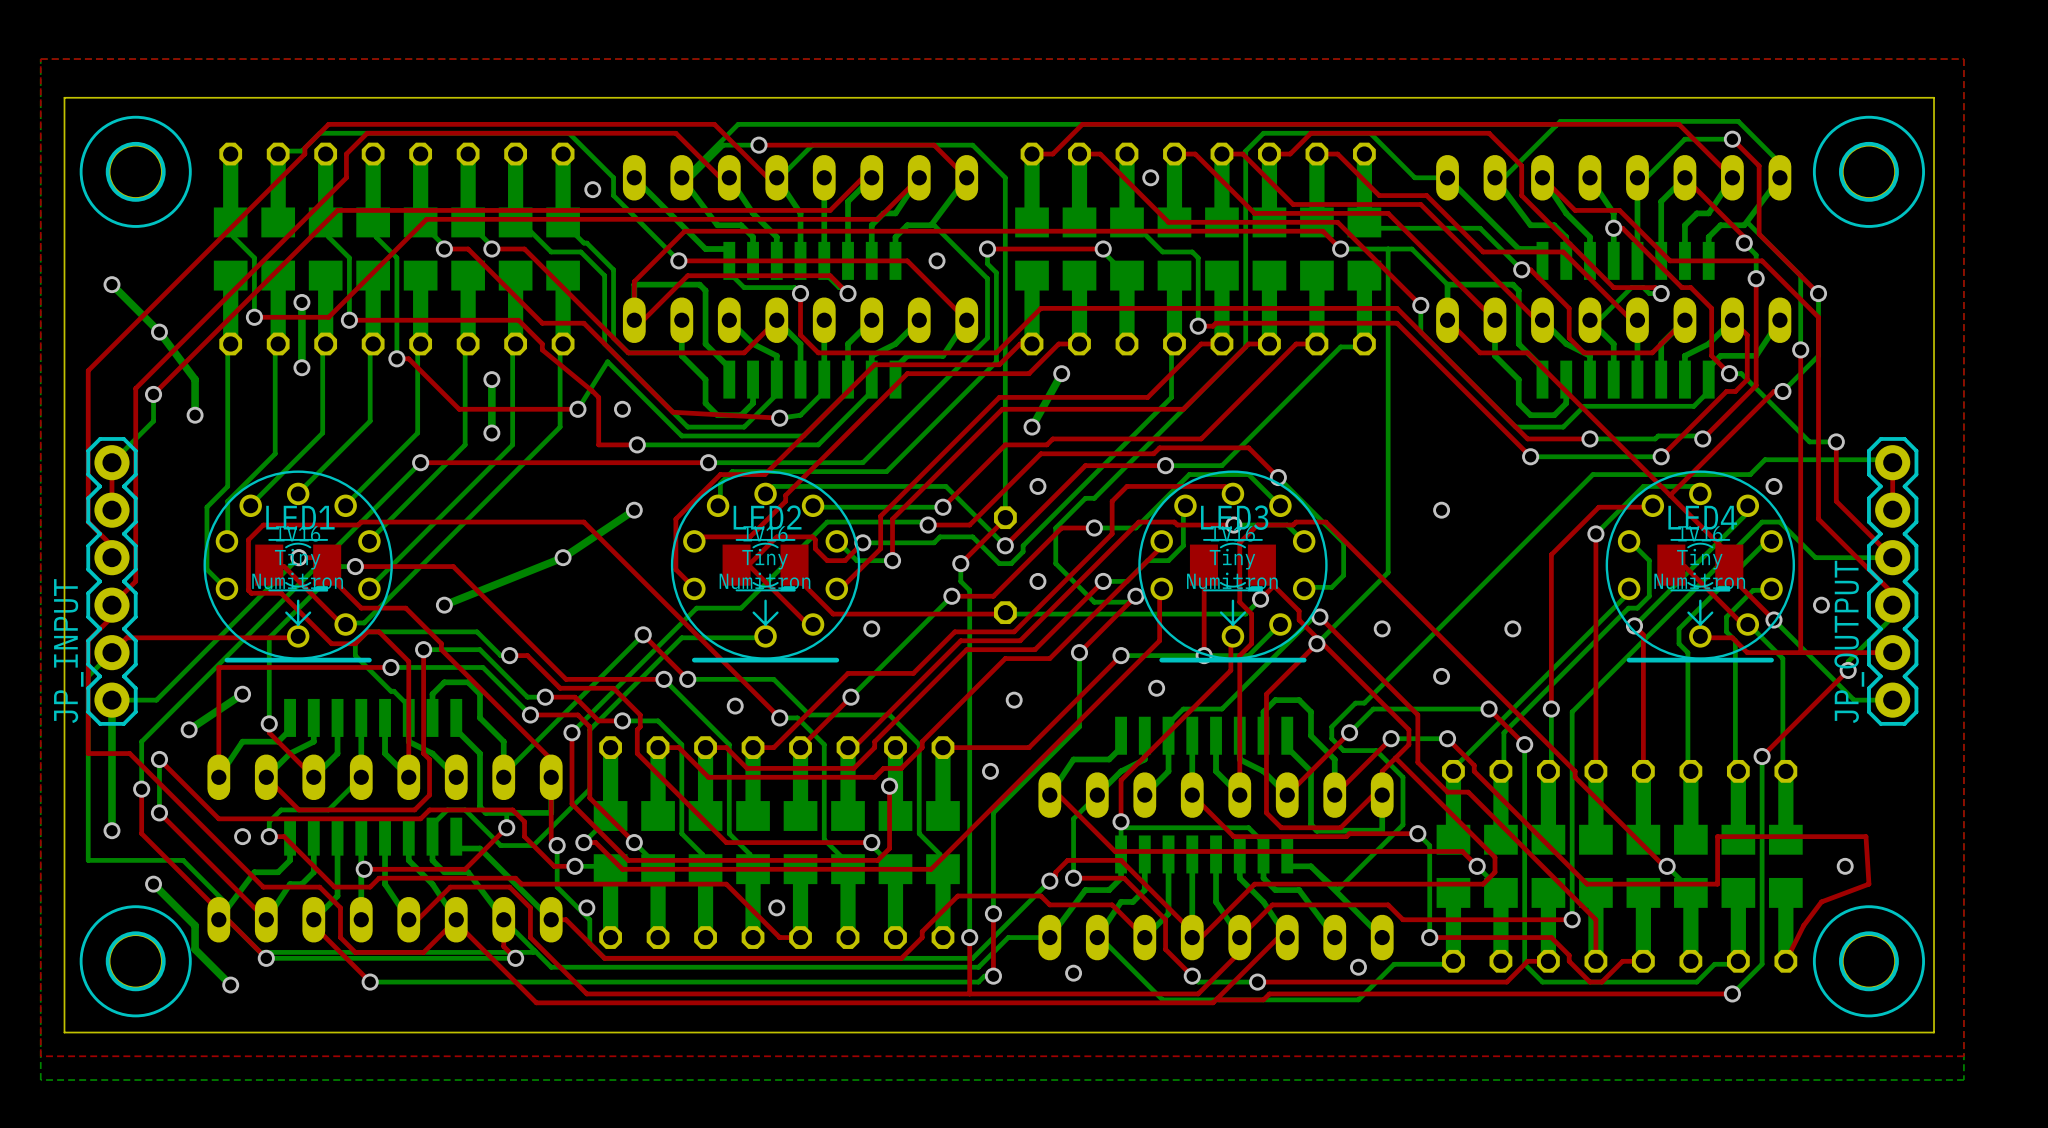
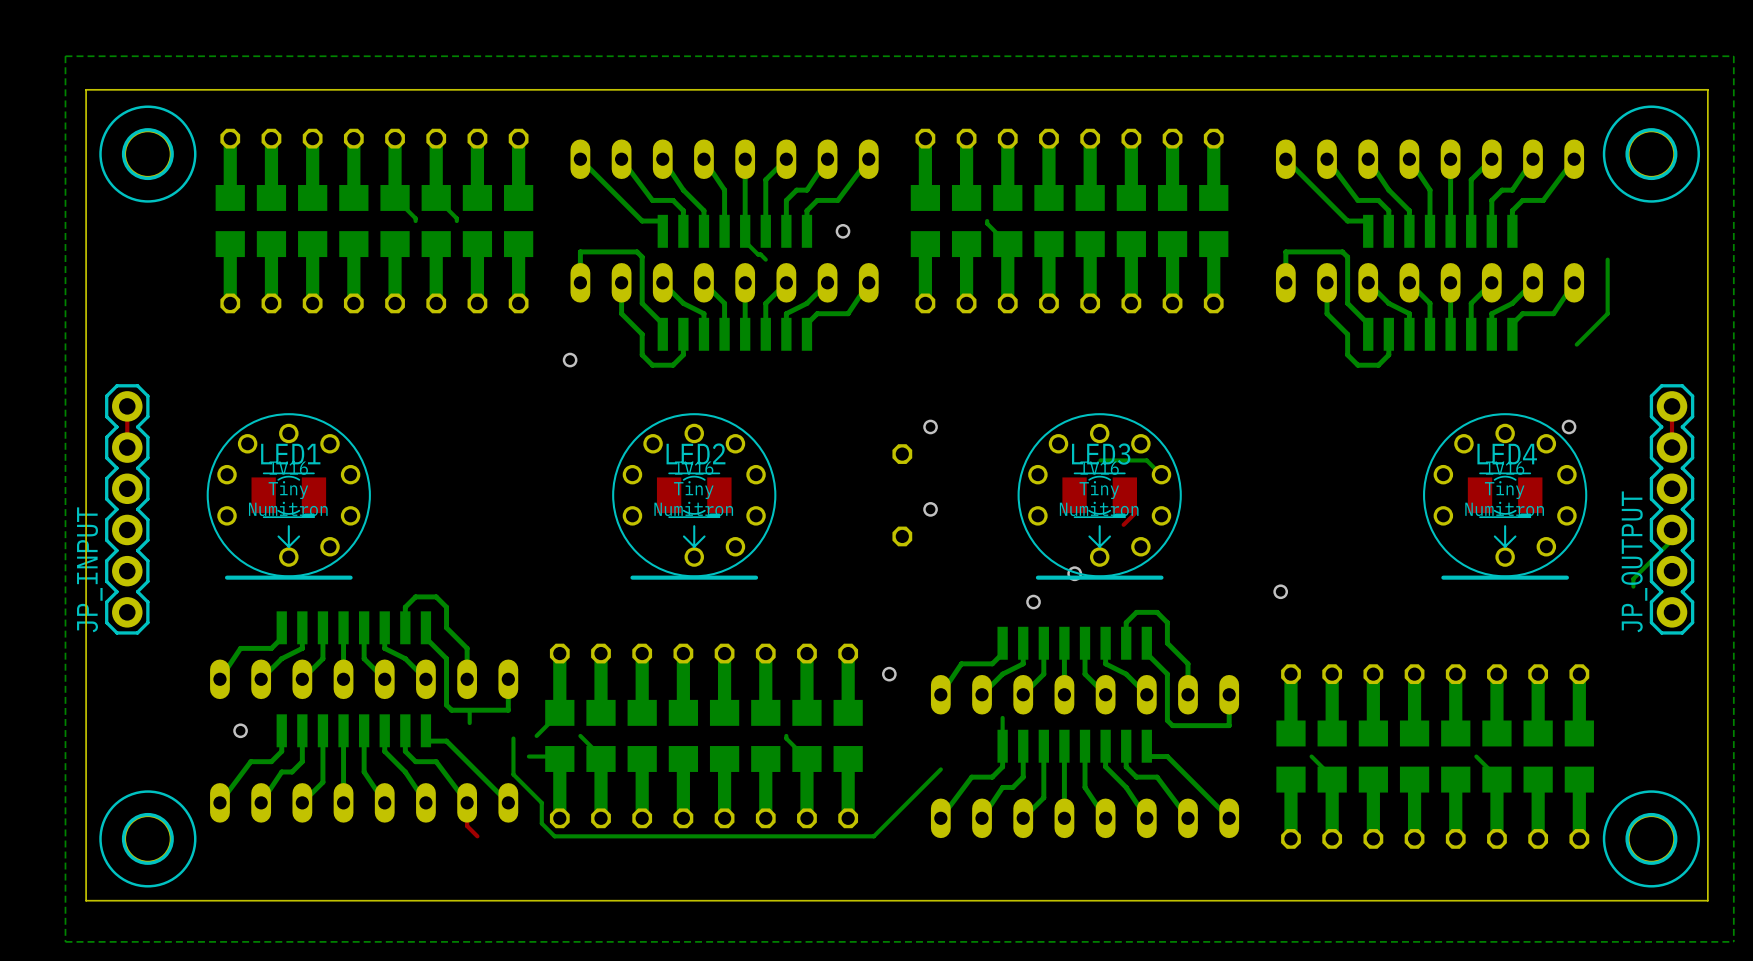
top zone outline: (40, 59) (1963, 59) (1963, 1056) (40, 1056) (40, 59) -> none
bottom track: (1555, 125) (738, 124) (684, 177) -> none
bottom track: (1732, 139) (1684, 139) (1646, 177) (1637, 177) -> none
top track: (1732, 139) (1759, 165) (1759, 234) (1818, 293) -> none
via: (1732, 139) -> none
bottom track: (758, 145) (723, 145) (690, 177) (681, 177) -> none
top track: (758, 145) (934, 145) (966, 177) -> none
via: (758, 145) -> none
bottom track: (278, 154) (284, 151) (301, 151) (319, 133) (569, 133) (613, 177) (613, 195) (678, 260) -> none
top track: (1032, 154) (1052, 154) (1082, 124) (1679, 124) (1732, 177) -> none
top track: (1079, 154) (1100, 154) (1168, 222) (1337, 222) (1420, 305) -> none
top track: (1174, 154) (1195, 154) (1254, 213) (1388, 213) (1495, 320) -> none
top track: (1221, 154) (1242, 154) (1293, 204) (1420, 204) (1536, 320) (1542, 320) -> none
top track: (1269, 154) (1290, 154) (1310, 133) (1489, 133) (1521, 165) (1521, 195) (1613, 287) (1655, 287) (1661, 293) -> none
top track: (1316, 154) (1337, 154) (1379, 195) (1426, 195) (1483, 251) (1563, 251) (1631, 320) (1637, 320) -> none
top track: (729, 177) (720, 177) (675, 133) (367, 133) (346, 154) (346, 177) (135, 388) (135, 581) (111, 605) (111, 617) (88, 640) (88, 753) (129, 753) (263, 887) (319, 887) (340, 907) (340, 937) (355, 952) (423, 952) (456, 919) (456, 922) (536, 1002) (1213, 1002) (1278, 937) (1287, 937) -> none
bottom track: (776, 177) (779, 177) (812, 145) (972, 145) (1005, 177) (1005, 517) -> none
top track: (776, 177) (767, 177) (714, 124) (328, 124) (304, 148) (304, 154) (88, 370) (88, 522) (111, 545) (111, 557) -> none
top track: (871, 177) (862, 177) (830, 210) (337, 210) (153, 394) -> none
top track: (919, 177) (877, 219) (426, 219) (328, 317) (254, 317) -> none
via: (1150, 177) -> none
bottom track: (1447, 177) (1414, 177) (1370, 133) (1263, 133) (1245, 151) (1245, 346) (1094, 498) (1085, 498) (1055, 527) (1055, 563) (1094, 602) (1129, 602) (1135, 596) -> none
bottom track: (1495, 177) (1503, 177) (1560, 121) (1738, 121) (1776, 159) (1776, 177) (1779, 177) -> none
top track: (1542, 177) (1575, 210) (1619, 210) (1670, 260) (1762, 260) (1818, 317) (1818, 519) (1892, 593) (1892, 605) -> none
top track: (1684, 177) (1744, 237) (1744, 243) -> none
via: (592, 189) -> none
bottom track: (230, 222) (233, 237) (254, 257) (254, 317) -> none
bottom track: (325, 222) (328, 237) (349, 257) (349, 320) -> none
bottom track: (373, 222) (376, 237) (396, 257) (396, 358) -> none
bottom track: (515, 222) (521, 228) (527, 228) (551, 251) (580, 251) (604, 275) (604, 343) (687, 427) (744, 427) (776, 394) (776, 379) -> none
bottom track: (563, 222) (613, 269) (613, 338) (628, 352) (681, 352) (681, 355) -> none
bottom track: (1126, 222) (1132, 228) (1138, 228) (1162, 251) (1192, 251) (1198, 257) (1198, 326) -> none
bottom track: (1364, 222) (1370, 228) (1480, 228) (1521, 269) -> none
bottom track: (931, 225) (934, 225) (987, 278) (987, 338) (862, 462) (708, 462) -> none
bottom track: (1744, 225) (1747, 222) (1800, 275) (1800, 349) -> none
top track: (1613, 228) (1622, 228) (1681, 287) (1690, 287) (1711, 308) (1711, 355) (1729, 373) -> none
via: (1613, 228) -> none
bottom track: (1744, 243) (1756, 254) (1756, 278) -> none
via: (1744, 243) -> none
top track: (444, 249) (468, 249) (542, 323) (583, 323) (672, 412) (779, 418) -> none
via: (444, 249) -> none
top track: (491, 249) (524, 249) (628, 352) (744, 352) (776, 320) -> none
via: (491, 249) -> none
bottom track: (705, 249) (729, 249) (729, 272) (744, 287) (794, 287) (800, 293) -> none
bottom track: (987, 249) (987, 263) (996, 272) (996, 361) (886, 471) (732, 471) (720, 483) (720, 504) (718, 505) -> none
top track: (987, 249) (1103, 249) -> none
via: (987, 249) -> none
via: (1103, 249) -> none
bottom track: (1340, 249) (1411, 249) (1447, 284) -> none
top track: (1340, 249) (1322, 231) (684, 231) (634, 281) (634, 320) (643, 320) (687, 275) (830, 275) (848, 293) -> none
via: (1340, 249) -> none
bottom track: (1388, 249) (1388, 572) (1316, 643) -> none
top track: (678, 260) (907, 260) (966, 320) -> none
via: (678, 260) -> none
top track: (1521, 269) (1530, 269) (1569, 308) (1569, 338) (1584, 352) (1652, 352) (1684, 320) -> none
via: (1521, 269) -> none
bottom track: (230, 275) (230, 343) (227, 349) (227, 486) (206, 507) (206, 569) (226, 588) -> none
bottom track: (278, 275) (278, 343) (275, 349) (275, 453) (227, 501) (226, 541) -> none
bottom track: (325, 275) (325, 343) (322, 349) (322, 433) (250, 505) -> none
bottom track: (373, 275) (370, 421) (298, 493) -> none
bottom track: (420, 275) (420, 343) (417, 349) (417, 433) (345, 505) -> none
bottom track: (468, 275) (468, 343) (465, 349) (465, 444) (369, 541) -> none
bottom track: (515, 275) (515, 343) (512, 349) (512, 444) (369, 588) -> none
bottom track: (563, 275) (563, 343) (560, 349) (560, 427) (364, 622) (345, 624) -> none
bottom track: (1174, 275) (1174, 343) (1171, 349) (1171, 397) (1023, 545) (1023, 551) (1011, 563) (999, 563) (972, 536) (940, 536) (934, 542) (862, 542) -> none
bottom track: (1364, 275) (1364, 343) (1358, 346) (1340, 346) (1221, 465) (1165, 465) -> none
top track: (1756, 278) (1756, 385) (1702, 438) -> none
via: (1756, 278) -> none
bottom track: (111, 284) (159, 332) (195, 379) (195, 415) -> none
via: (111, 284) -> none
top track: (800, 293) (800, 335) (818, 352) (996, 352) (1040, 308) (1397, 308) (1527, 438) (1589, 438) -> none
via: (800, 293) -> none
via: (848, 293) -> none
bottom track: (1661, 293) (1649, 293) (1643, 287) (1631, 287) (1595, 323) (1589, 320) -> none
via: (1661, 293) -> none
via: (1818, 293) -> none
bottom track: (301, 302) (301, 367) -> none
via: (301, 302) -> none
bottom track: (1420, 305) (1420, 332) (1515, 427) (1563, 427) (1584, 406) (1693, 406) (1708, 391) (1708, 367) -> none
via: (1420, 305) -> none
via: (254, 317) -> none
top track: (349, 320) (518, 320) (542, 343) (542, 349) (598, 397) (598, 444) (637, 444) -> none
via: (349, 320) -> none
top track: (1447, 320) (1480, 352) (1527, 352) (1726, 551) (1729, 575) (1773, 619) -> none
top track: (1732, 320) (1747, 335) (1747, 379) (1735, 391) (1726, 391) (1661, 456) -> none
top track: (1198, 326) (1213, 326) (1216, 323) (1397, 323) (1530, 456) -> none
via: (1198, 326) -> none
via: (159, 332) -> none
top track: (1032, 343) (1020, 343) (999, 364) (874, 364) (764, 474) (720, 474) (675, 519) (675, 569) (694, 588) -> none
top track: (1079, 343) (1058, 343) (1029, 373) (907, 373) (785, 495) (785, 501) (750, 536) (699, 536) (694, 541) -> none
top track: (1221, 343) (1201, 343) (1147, 397) (999, 397) (880, 516) (880, 548) (839, 590) (836, 588) -> none
top track: (1269, 343) (1248, 343) (1183, 409) (1002, 409) (892, 519) (892, 560) -> none
top track: (1316, 343) (1296, 343) (1201, 438) (1052, 438) (1046, 444) (1005, 444) (942, 507) -> none
top track: (1800, 349) (1800, 652) -> none
via: (1800, 349) -> none
top track: (396, 358) (408, 358) (459, 409) (577, 409) -> none
via: (396, 358) -> none
via: (301, 367) -> none
bottom track: (1061, 373) (1032, 427) -> none
via: (1061, 373) -> none
bottom track: (1729, 373) (1741, 373) (1809, 441) (1836, 441) -> none
via: (1729, 373) -> none
bottom track: (491, 379) (491, 433) -> none
via: (491, 379) -> none
bottom track: (824, 379) (824, 391) (800, 415) (779, 418) -> none
bottom track: (848, 379) (848, 391) (803, 435) (681, 435) (607, 361) (577, 409) -> none
bottom track: (871, 379) (871, 391) (818, 444) (637, 444) -> none
top track: (1782, 391) (1773, 391) (1670, 495) -> none
via: (1782, 391) -> none
bottom track: (153, 394) (153, 421) (111, 462) -> none
via: (153, 394) -> none
via: (577, 409) -> none
via: (195, 415) -> none
via: (779, 418) -> none
via: (1032, 427) -> none
via: (491, 433) -> none
bottom track: (1589, 438) (1655, 438) (1658, 435) (1699, 435) (1702, 438) -> none
via: (1589, 438) -> none
via: (1702, 438) -> none
top track: (1836, 441) (1836, 501) (1892, 557) -> none
via: (1836, 441) -> none
via: (637, 444) -> none
bottom track: (1530, 456) (1661, 456) -> none
via: (1530, 456) -> none
via: (1661, 456) -> none
bottom track: (420, 462) (141, 741) (141, 789) -> none
top track: (420, 462) (708, 462) -> none
via: (420, 462) -> none
via: (708, 462) -> none
bottom track: (1892, 462) (1889, 459) (1765, 459) (1750, 474) (1592, 474) (1364, 703) (1355, 703) (1331, 726) (1331, 738) (1343, 750) (1376, 750) (1403, 777) (1403, 824) (1337, 890) (1310, 866) -> none
top track: (1165, 465) (1085, 465) (1005, 545) -> none
via: (1165, 465) -> none
bottom track: (1278, 477) (1343, 542) (1343, 575) (1331, 587) (1304, 588) -> none
top track: (1278, 477) (1248, 447) (1159, 447) (1153, 453) (1040, 453) (969, 525) (928, 525) -> none
via: (1278, 477) -> none
bottom track: (765, 493) (773, 486) (945, 486) (1005, 545) -> none
top track: (1232, 493) (1224, 486) (1126, 486) (1112, 501) (1112, 533) (1014, 631) (954, 631) (913, 673) (848, 673) (773, 747) (753, 747) -> none
bottom track: (1700, 493) (1693, 486) (1643, 486) (1595, 533) -> none
bottom track: (813, 505) (942, 507) -> none
bottom track: (1185, 505) (1183, 507) (1183, 545) (1168, 560) (1147, 560) (1126, 581) (1103, 581) -> none
bottom track: (1280, 505) (1248, 474) (1189, 474) (1135, 527) (1094, 527) -> none
top track: (1652, 505) (1598, 507) (1551, 554) (1551, 709) -> none
bottom track: (1747, 505) (1747, 513) (1634, 625) -> none
via: (942, 507) -> none
bottom track: (634, 510) (563, 557) (444, 605) -> none
via: (634, 510) -> none
via: (1441, 510) -> none
top track: (1005, 517) (960, 563) -> none
bottom track: (928, 525) (925, 522) (827, 522) (741, 608) (696, 608) (572, 732) -> none
via: (928, 525) -> none
top track: (1233, 525) (1177, 525) (1174, 522) (1138, 522) (1020, 640) (960, 640) (853, 747) (848, 747) -> none
via: (1233, 525) -> none
top track: (1094, 527) (1061, 527) (993, 596) (951, 596) -> none
via: (1094, 527) -> none
top track: (1595, 533) (1595, 771) -> none
via: (1595, 533) -> none
bottom track: (836, 541) (856, 560) (892, 560) -> none
top track: (1161, 541) (1159, 542) (1159, 548) (1049, 658) (1005, 658) (922, 741) (922, 747) (901, 768) (883, 768) (874, 777) (708, 777) (678, 747) (658, 747) -> none
bottom track: (1629, 541) (1649, 560) (1649, 596) (1637, 608) (1628, 608) (1503, 732) (1503, 765) (1500, 771) -> none
bottom track: (1771, 541) (1765, 542) (1679, 628) (1679, 643) (1687, 652) (1687, 765) (1690, 771) -> none
top track: (862, 542) (845, 560) (827, 560) (815, 548) (815, 539) (812, 536) (776, 536) (747, 566) (736, 565) (738, 566) (750, 566) (806, 622) (813, 624) -> none
via: (862, 542) -> none
via: (1005, 545) -> none
bottom track: (298, 557) (156, 700) (111, 700) (111, 830) -> none
top track: (298, 557) (319, 557) (328, 566) (328, 575) (361, 608) (405, 608) (441, 643) (441, 649) (551, 759) (551, 839) (557, 845) -> none
via: (298, 557) -> none
via: (563, 557) -> none
bottom track: (1892, 557) (1815, 557) (1779, 522) (1762, 522) (1572, 712) (1572, 919) -> none
via: (892, 560) -> none
bottom track: (960, 563) (960, 581) (969, 590) (969, 937) -> none
via: (960, 563) -> none
top track: (269, 565) (284, 566) (343, 625) (345, 624) -> none
top track: (794, 565) (794, 575) (833, 614) (1005, 612) -> none
top track: (1203, 565) (1204, 655) -> none
top track: (1261, 565) (1263, 575) (1299, 611) (1299, 619) (1408, 729) (1408, 744) (1382, 771) (1382, 795) (1373, 795) (1340, 827) (1281, 827) (1266, 812) (1266, 694) (1316, 643) -> none
top track: (1671, 565) (1684, 566) (1741, 622) (1747, 624) -> none
bottom track: (355, 566) (340, 566) (269, 637) (269, 723) -> none
top track: (355, 566) (453, 566) (566, 679) (664, 679) -> none
via: (355, 566) -> none
top track: (1103, 581) (1034, 649) (966, 649) (874, 741) (874, 747) (853, 768) (747, 768) (726, 747) (705, 747) -> none
via: (1103, 581) -> none
top track: (1161, 588) (1159, 590) (1159, 640) (931, 869) (622, 869) (595, 842) (583, 842) -> none
bottom track: (1629, 588) (1631, 590) (1456, 765) (1453, 771) -> none
bottom track: (1771, 588) (1753, 590) (1726, 617) (1726, 631) (1735, 640) (1735, 765) (1738, 771) -> none
bottom track: (951, 596) (850, 697) -> none
via: (951, 596) -> none
top track: (1135, 596) (1079, 652) -> none
via: (1135, 596) -> none
bottom track: (1260, 599) (1245, 614) (1005, 612) -> none
via: (1260, 599) -> none
via: (444, 605) -> none
via: (1821, 605) -> none
bottom track: (1319, 617) (1313, 617) (1221, 709) (1183, 709) (1168, 723) (1168, 735) -> none
top track: (1319, 617) (1417, 714) (1417, 762) (1447, 792) (1468, 792) (1595, 919) (1595, 961) -> none
via: (1319, 617) -> none
bottom track: (1773, 619) (1854, 700) (1892, 700) -> none
via: (1773, 619) -> none
bottom track: (1280, 624) (1248, 655) (1121, 655) -> none
bottom track: (1747, 624) (1782, 658) (1782, 765) (1785, 771) -> none
top track: (1634, 625) (1643, 634) (1643, 771) -> none
via: (1634, 625) -> none
via: (871, 628) -> none
via: (1382, 628) -> none
via: (1512, 628) -> none
bottom track: (643, 634) (503, 774) (503, 777) -> none
top track: (643, 634) (687, 679) -> none
via: (643, 634) -> none
top track: (298, 636) (126, 637) (111, 652) -> none
bottom track: (765, 636) (681, 637) (589, 729) (589, 789) (533, 845) (500, 845) (465, 809) (447, 809) (432, 824) (432, 836) -> none
top track: (1232, 636) (1230, 637) (1230, 670) (1121, 780) (1121, 821) -> none
top track: (1700, 636) (1732, 637) (1747, 652) (1892, 652) -> none
via: (1316, 643) -> none
bottom track: (423, 649) (479, 649) (527, 697) (545, 697) -> none
top track: (423, 649) (423, 753) (429, 759) (429, 795) (414, 809) (298, 809) (266, 777) -> none
via: (423, 649) -> none
bottom track: (111, 652) (88, 676) (88, 860) (183, 860) (227, 904) (218, 919) (227, 919) (260, 952) (534, 950) -> none
bottom track: (1079, 652) (1079, 726) (993, 812) (993, 913) -> none
via: (1079, 652) -> none
bottom track: (509, 655) (500, 655) (477, 631) (367, 631) (355, 643) (355, 655) (408, 706) (408, 717) -> none
top track: (509, 655) (527, 655) (560, 688) (613, 688) (640, 714) (640, 726) (637, 729) (637, 753) (726, 842) (871, 842) -> none
via: (509, 655) -> none
top track: (1121, 655) (1029, 747) (942, 747) -> none
via: (1121, 655) -> none
bottom track: (390, 667) (482, 667) (530, 714) -> none
top track: (390, 667) (218, 667) (218, 777) -> none
via: (390, 667) -> none
top track: (1848, 670) (1762, 756) -> none
via: (1848, 670) -> none
bottom track: (664, 679) (729, 744) (729, 833) (750, 854) (753, 869) (753, 937) -> none
via: (664, 679) -> none
bottom track: (687, 679) (773, 679) (809, 714) (889, 714) (919, 744) (919, 833) (940, 854) (942, 869) (942, 937) -> none
via: (687, 679) -> none
bottom track: (242, 694) (189, 729) -> none
via: (242, 694) -> none
top track: (545, 697) (574, 697) (598, 720) (622, 720) -> none
via: (545, 697) -> none
top track: (850, 697) (800, 747) -> none
via: (850, 697) -> none
via: (1014, 700) -> none
via: (735, 706) -> none
bottom track: (1489, 709) (1373, 709) (1349, 732) -> none
top track: (1489, 709) (1524, 744) -> none
via: (1489, 709) -> none
bottom track: (1551, 709) (1551, 765) (1548, 771) -> none
via: (1551, 709) -> none
top track: (530, 714) (577, 714) (589, 726) (589, 798) (634, 842) -> none
via: (530, 714) -> none
bottom track: (779, 717) (797, 717) (824, 744) (824, 839) (845, 860) (848, 869) (848, 937) -> none
top track: (779, 717) (583, 522) (361, 522) (358, 525) (263, 525) (248, 539) (248, 590) (251, 593) (281, 593) (331, 643) (355, 643) (367, 631) (379, 631) (408, 661) (408, 777) -> none
via: (779, 717) -> none
bottom track: (622, 720) (658, 720) (681, 744) (681, 833) (702, 854) (705, 869) (705, 937) -> none
via: (622, 720) -> none
top track: (269, 723) (269, 732) (313, 777) -> none
via: (269, 723) -> none
via: (189, 729) -> none
top track: (572, 732) (572, 804) (628, 860) (877, 860) (889, 848) (889, 786) -> none
via: (572, 732) -> none
top track: (1349, 732) (1287, 795) -> none
via: (1349, 732) -> none
bottom track: (1391, 738) (1447, 738) -> none
top track: (1391, 738) (1334, 795) -> none
via: (1391, 738) -> none
top track: (1447, 738) (1474, 765) (1474, 771) (1587, 884) (1717, 884) (1717, 836) (1865, 836) (1868, 884) (1821, 901) (1803, 925) (1785, 961) -> none
via: (1447, 738) -> none
bottom track: (1524, 744) (1524, 964) (1542, 982) (1696, 982) (1714, 964) (1732, 964) (1738, 961) (1738, 892) -> none
via: (1524, 744) -> none
bottom track: (1762, 756) (1762, 964) (1732, 993) -> none
via: (1762, 756) -> none
top track: (1395, 758) (1495, 857) (1495, 872) (1483, 884) (1254, 884) (1201, 937) (1192, 937) -> none
bottom track: (159, 759) (159, 812) -> none
top track: (159, 759) (218, 818) (420, 818) (429, 809) (512, 809) (524, 821) (524, 836) (554, 866) (574, 866) -> none
via: (159, 759) -> none
bottom track: (361, 777) (328, 809) (281, 809) (269, 821) (269, 836) -> none
via: (889, 786) -> none
top track: (141, 789) (141, 833) (266, 958) -> none
via: (141, 789) -> none
top track: (1049, 795) (1058, 795) (1115, 851) (1462, 851) (1477, 866) -> none
bottom track: (1097, 795) (1073, 818) (1073, 878) -> none
top track: (1192, 795) (1233, 836) (1346, 836) (1349, 833) (1417, 833) -> none
top track: (1239, 795) (1239, 655) (1251, 643) (1251, 614) (1239, 602) (1239, 542) (1257, 525) (1293, 525) (1296, 522) (1325, 522) (1575, 771) (1575, 777) (1664, 866) (1667, 866) -> none
top track: (159, 812) (266, 919) -> none
via: (159, 812) -> none
via: (1121, 821) -> none
top track: (506, 827) (465, 869) (364, 869) -> none
via: (506, 827) -> none
bottom track: (1121, 827) (1248, 827) (1263, 842) (1263, 854) -> none
via: (111, 830) -> none
bottom track: (1417, 833) (1429, 845) (1429, 937) -> none
via: (1417, 833) -> none
top track: (269, 836) (284, 836) (334, 887) (370, 887) (379, 878) (515, 878) (521, 884) (726, 884) (779, 937) (800, 937) -> none
via: (269, 836) -> none
via: (583, 842) -> none
via: (634, 842) -> none
via: (871, 842) -> none
via: (557, 845) -> none
via: (574, 866) -> none
via: (1477, 866) -> none
via: (1667, 866) -> none
via: (1845, 866) -> none
via: (364, 869) -> none
top track: (1073, 878) (1124, 878) (1165, 919) (1165, 949) (1192, 976) -> none
via: (1073, 878) -> none
top track: (1049, 881) (1067, 860) (1121, 860) (1198, 937) -> none
via: (1049, 881) -> none
bottom track: (153, 884) (195, 925) (195, 949) (230, 985) -> none
via: (153, 884) -> none
bottom track: (1453, 892) (1453, 961) (1447, 964) (1394, 964) (1358, 999) (1162, 999) (1100, 937) (1097, 937) -> none
via: (586, 907) -> none
via: (776, 907) -> none
top track: (993, 913) (993, 976) -> none
via: (993, 913) -> none
top track: (313, 919) (313, 925) (370, 982) -> none
top track: (408, 919) (417, 919) (450, 887) (509, 887) (530, 907) (530, 937) (586, 993) (1198, 993) (1239, 952) (1239, 937) (1272, 904) (1388, 904) (1403, 919) (1572, 919) -> none
bottom track: (503, 919) (551, 967) (978, 967) (1008, 937) (1049, 937) -> none
top track: (551, 919) (566, 919) (604, 958) (901, 958) (922, 937) (922, 931) (957, 896) (1040, 896) (1049, 904) (1112, 904) (1144, 937) -> none
via: (1572, 919) -> none
top track: (969, 937) (969, 993) -> none
via: (969, 937) -> none
top track: (1429, 937) (1551, 937) (1569, 955) (1569, 961) (1589, 982) (1601, 982) (1622, 961) (1643, 961) -> none
via: (1429, 937) -> none
bottom track: (266, 958) (515, 958) -> none
via: (266, 958) -> none
via: (515, 958) -> none
top track: (1548, 961) (1527, 961) (1506, 982) (1257, 982) -> none
via: (1358, 967) -> none
via: (1073, 973) -> none
bottom track: (993, 976) (984, 976) (978, 982) (370, 982) -> none
via: (993, 976) -> none
bottom track: (1192, 976) (1198, 982) (1257, 982) -> none
via: (1192, 976) -> none
via: (370, 982) -> none
via: (1257, 982) -> none
via: (230, 985) -> none
top track: (1732, 993) (1269, 993) (1263, 999) (1217, 998) -> none
via: (1732, 993) -> none

